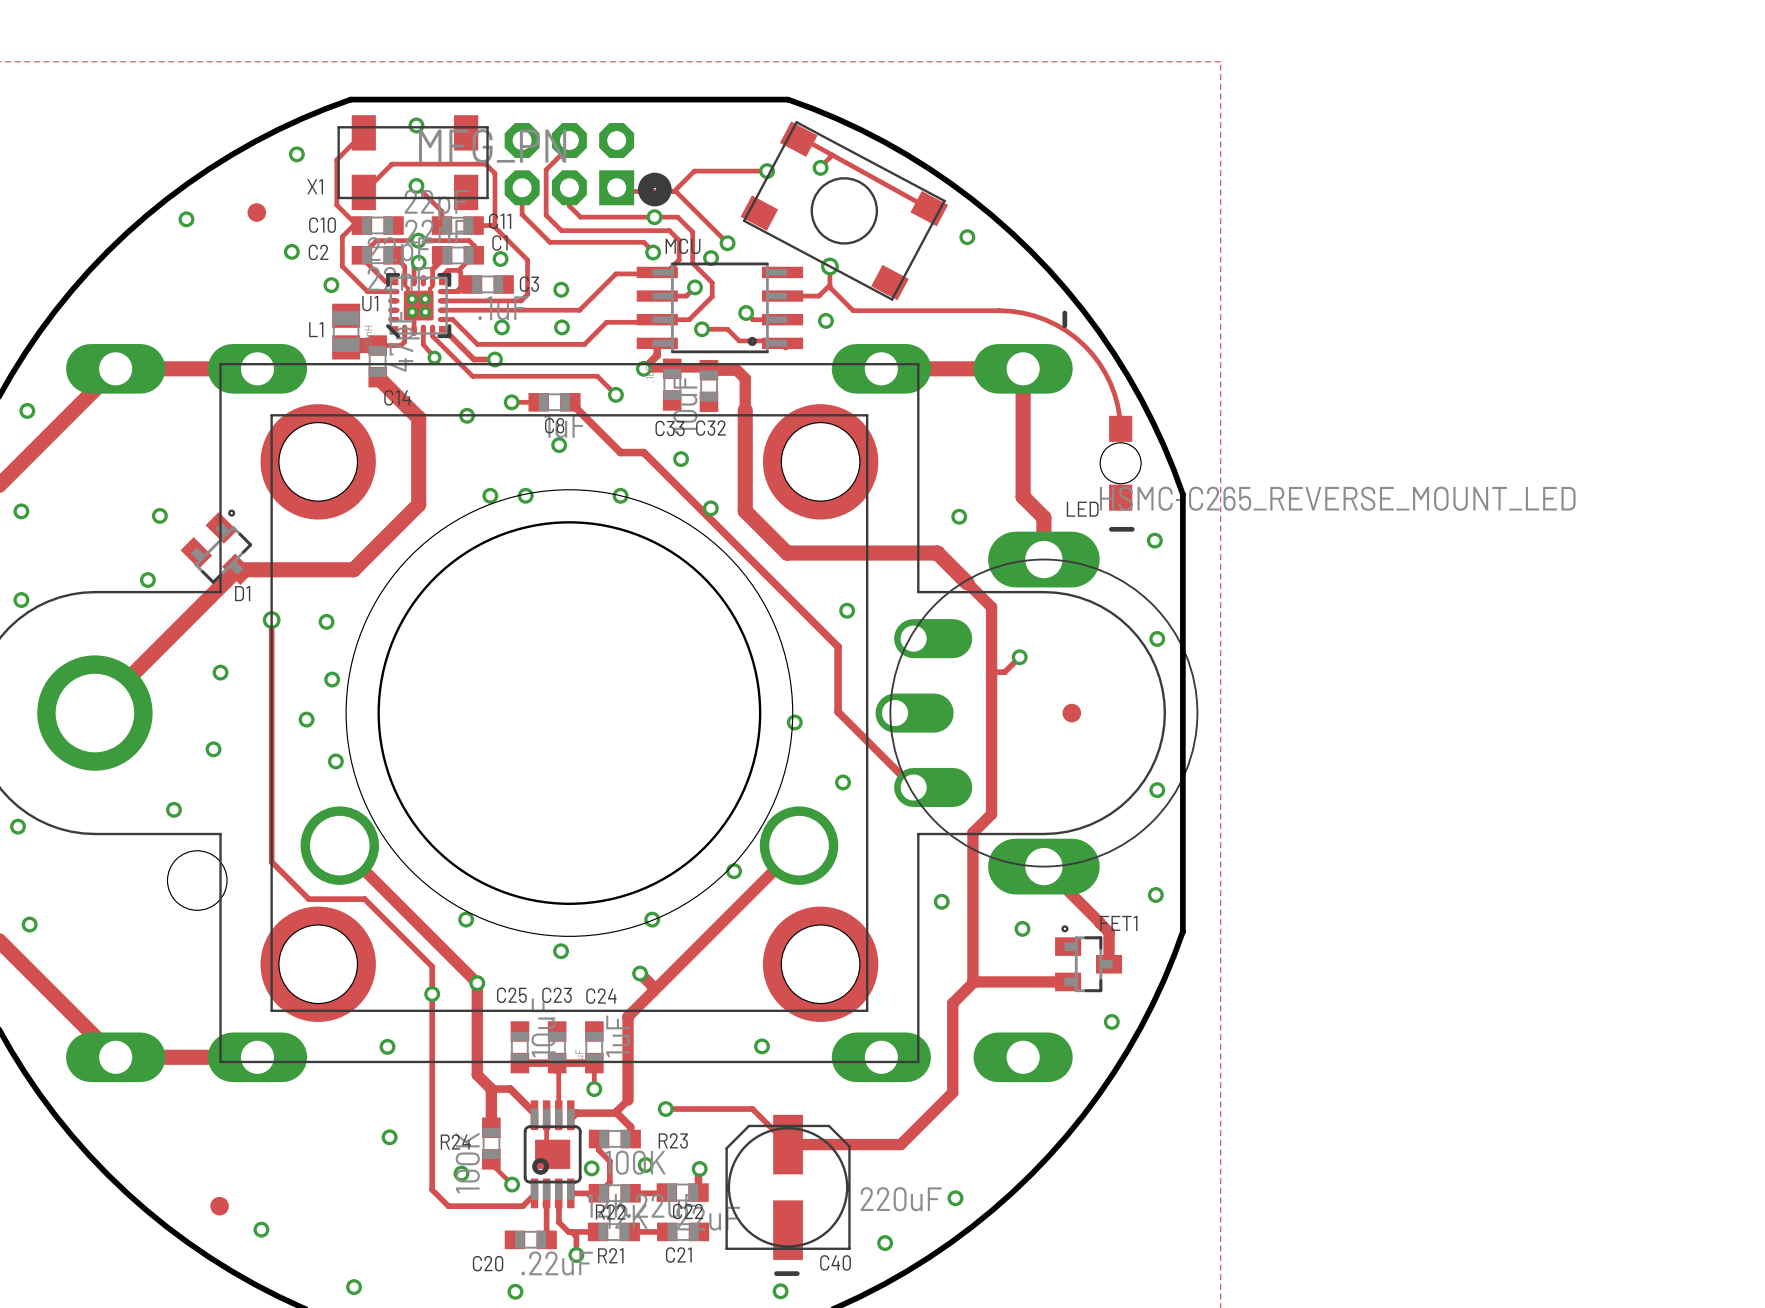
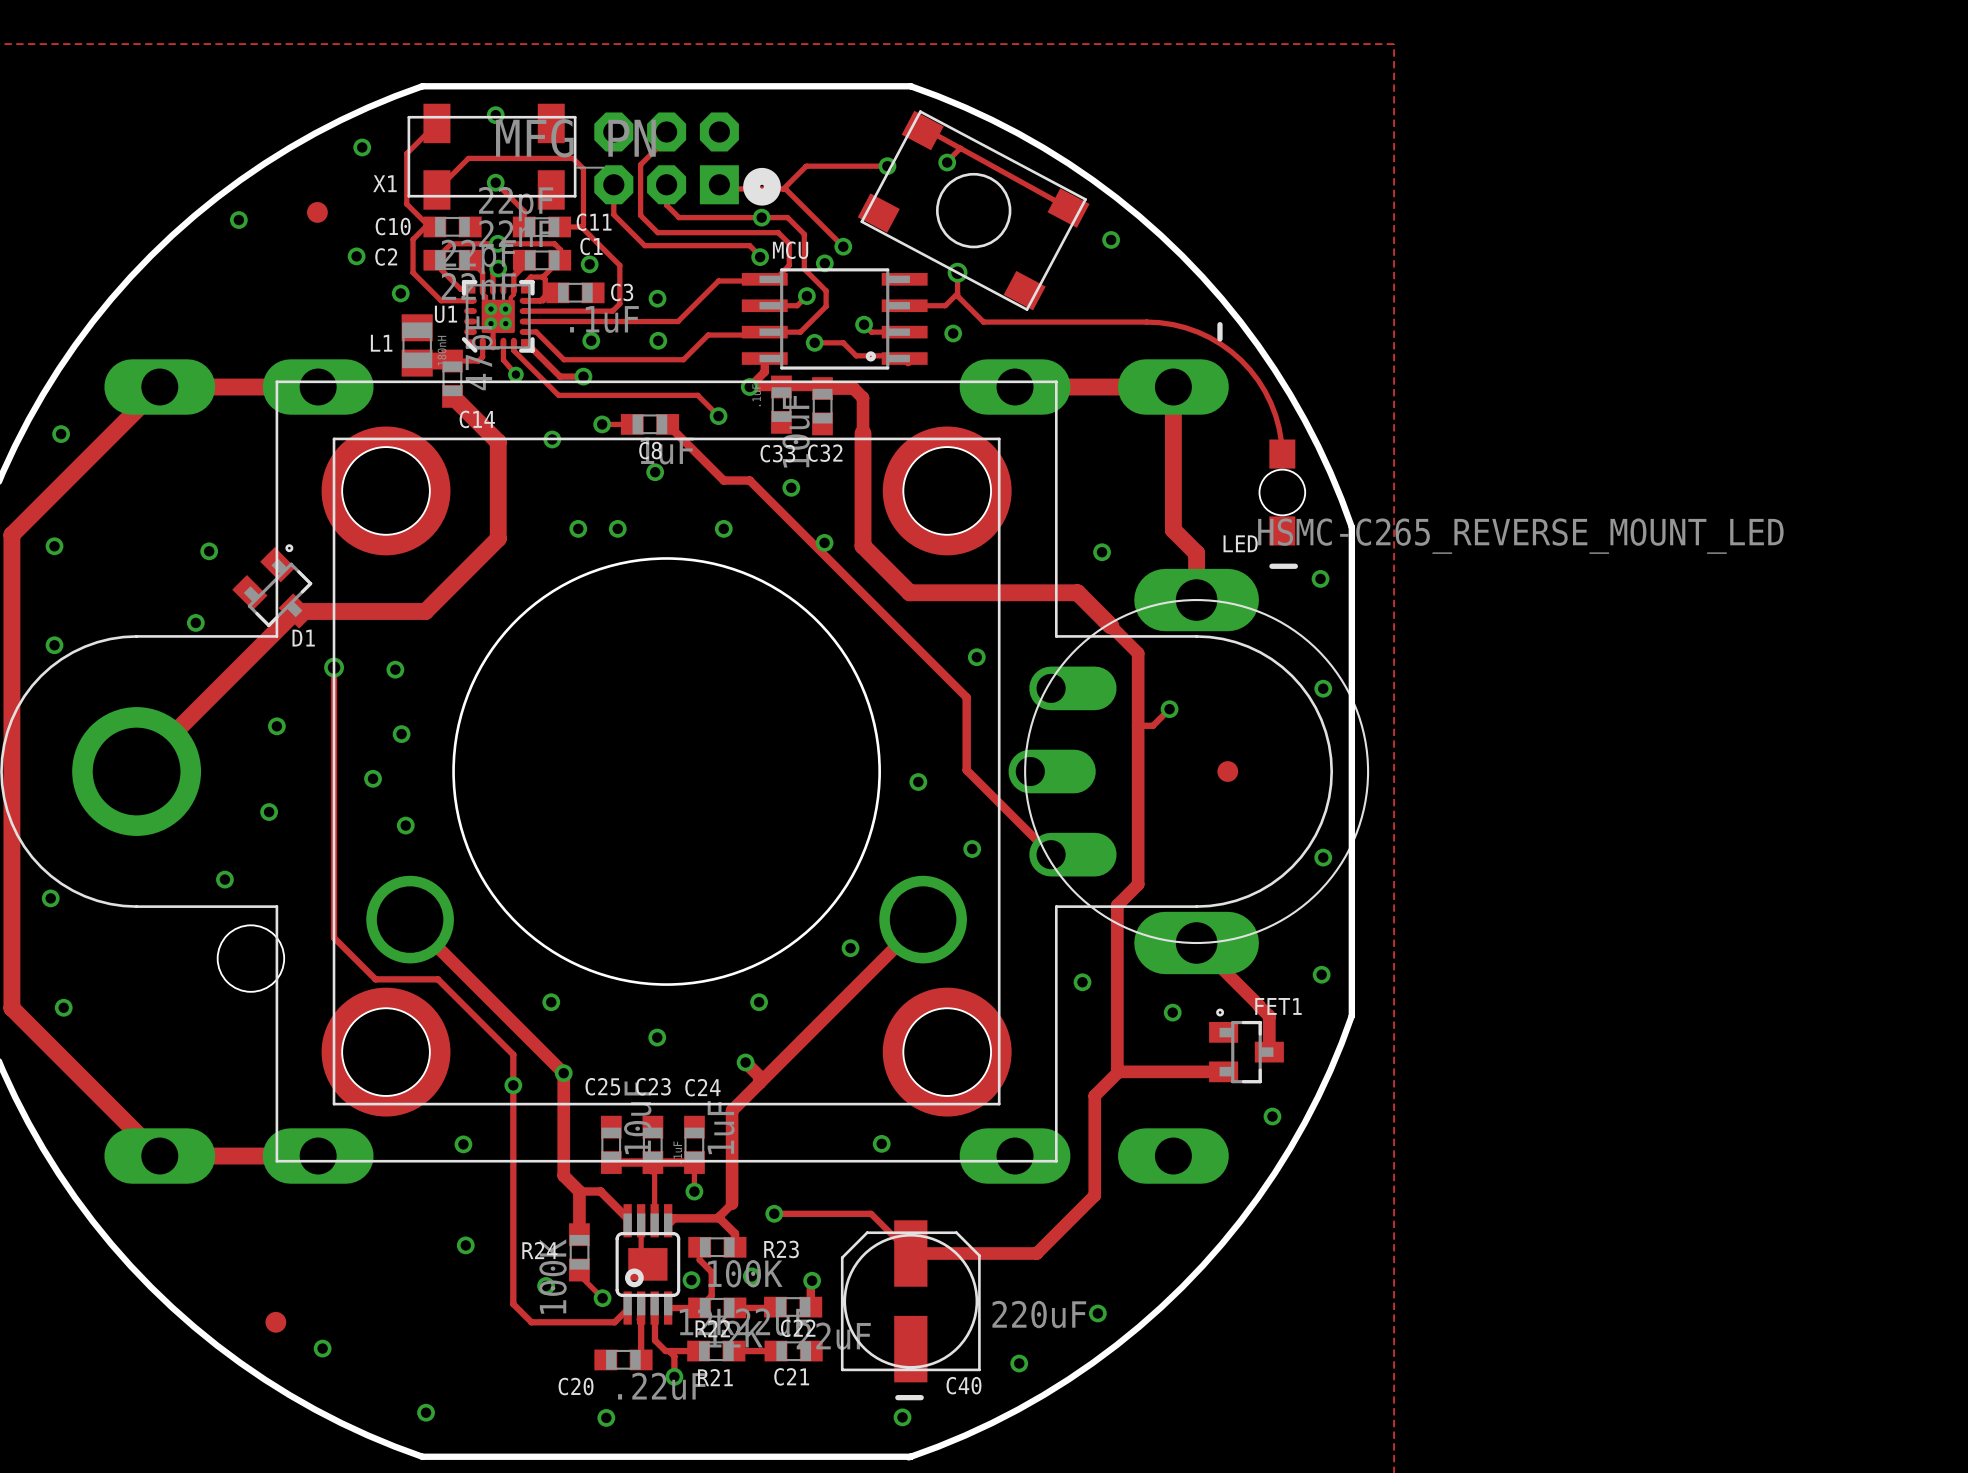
round board edge: [346, 489, 793, 937] -> none

